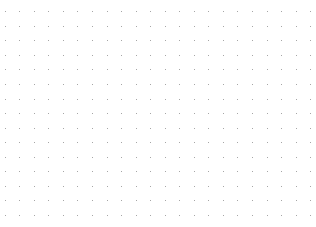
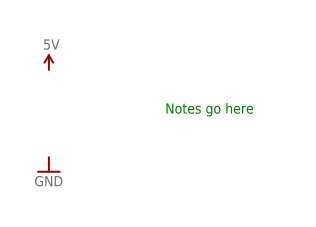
power symbol: none -> 5V (48, 62)
text: none -> Notes go here (209, 109)
power symbol: none -> GND (48, 164)

